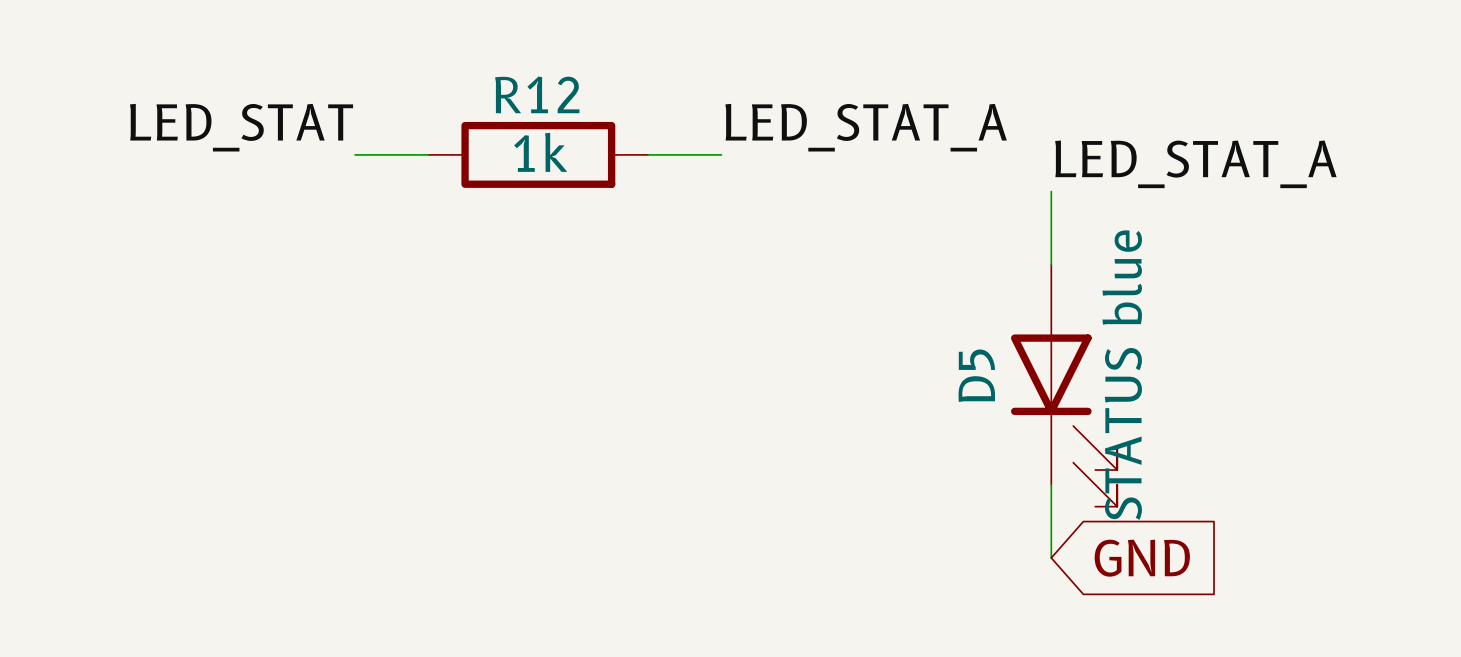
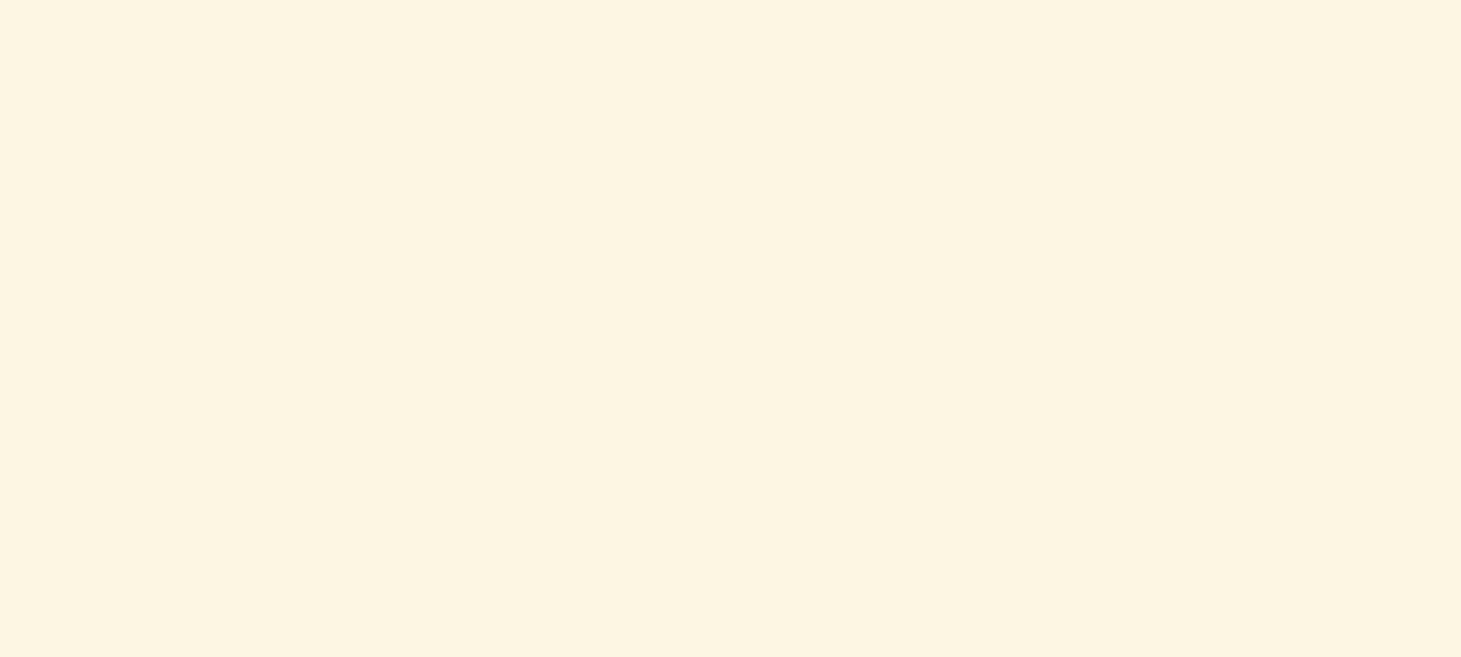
label: LED_STAT (241, 127) -> none
label: LED_STAT_A (866, 127) -> none
wire: (355, 154) (428, 154) -> none
R12: 1k (538, 154) -> none
wire: (648, 154) (721, 154) -> none
label: LED_STAT_A (1195, 164) -> none
wire: (1051, 191) (1051, 264) -> none
D5: STATUS blue (1064, 385) -> none
wire: (1051, 484) (1051, 557) -> none
global label: GND (1142, 558) -> none

